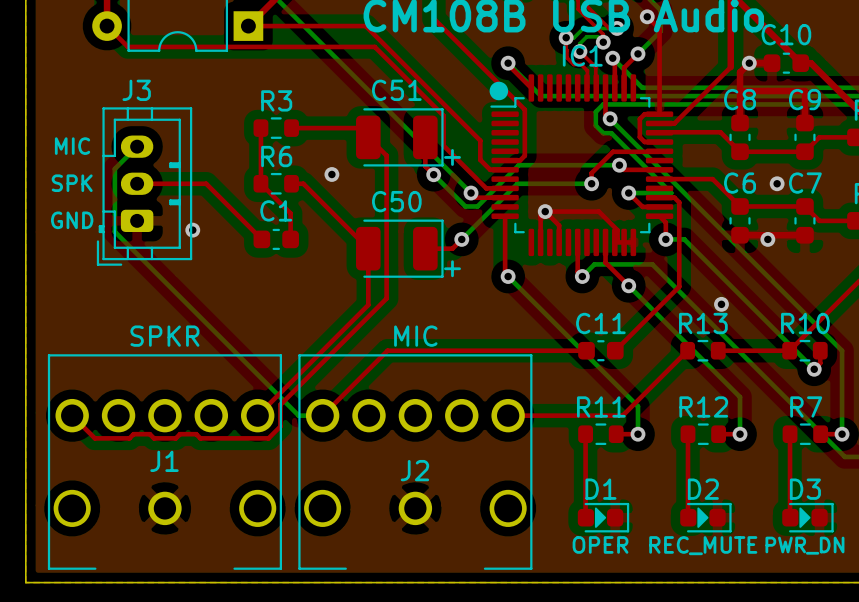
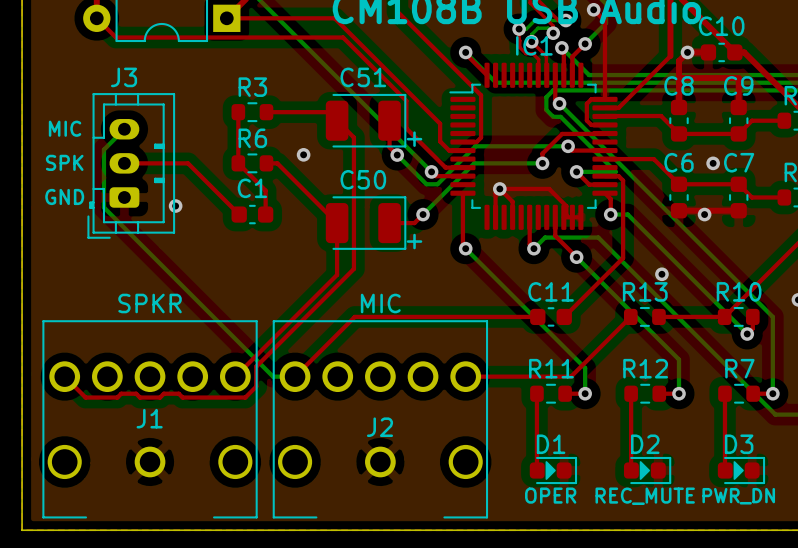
IC1 footprint: [489, 74, 674, 257] -> [449, 62, 618, 230]

